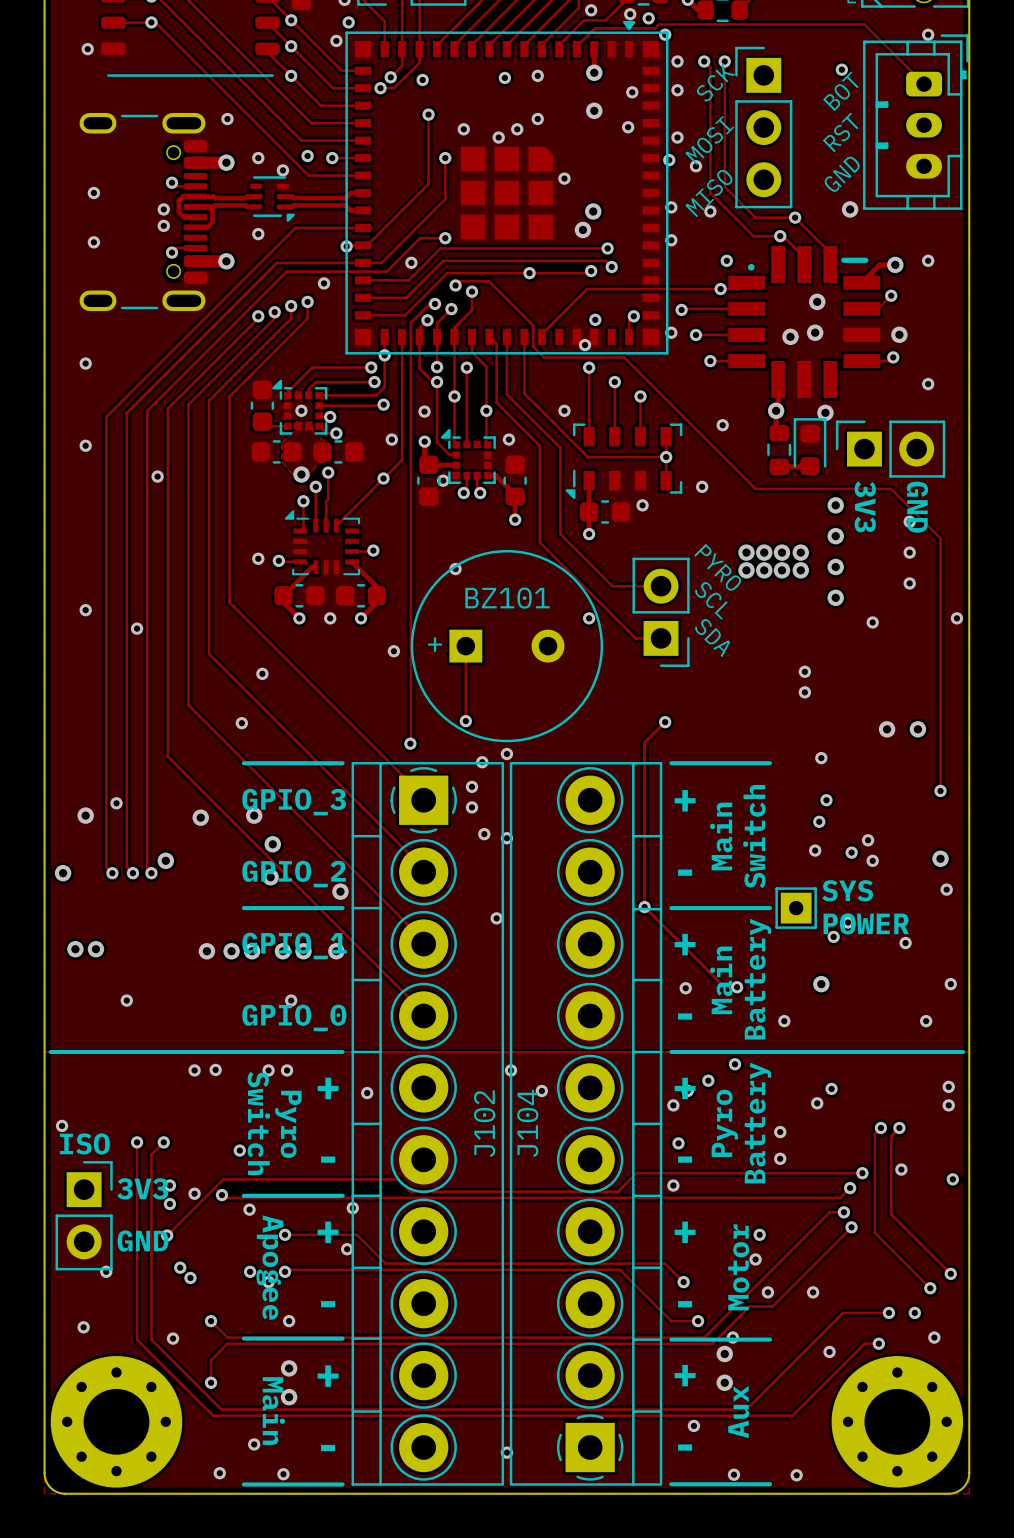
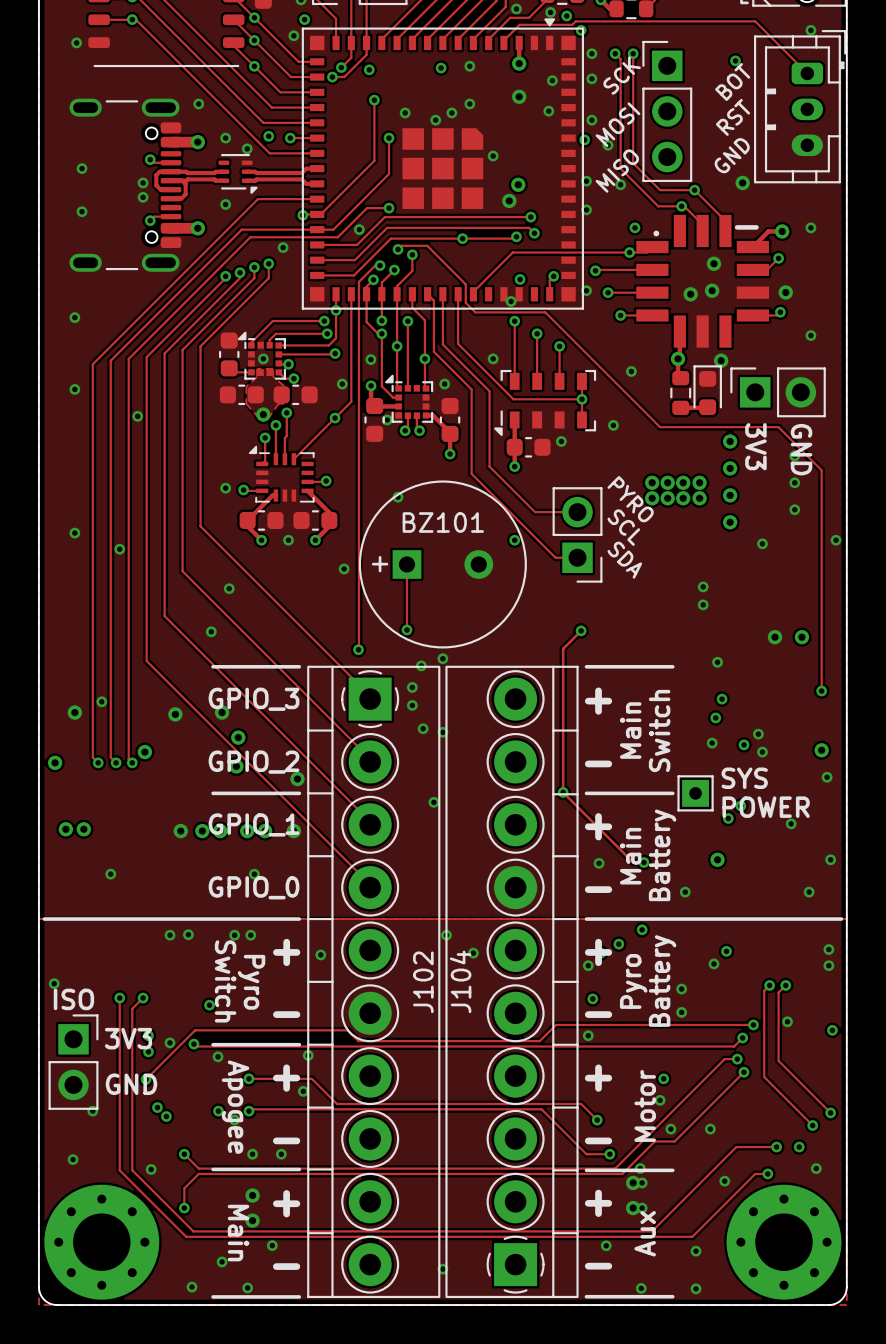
via: none -> (281, 1154)
via: none -> (642, 1182)
via: none -> (642, 1208)
via: none -> (272, 1245)
via: none -> (696, 1251)

